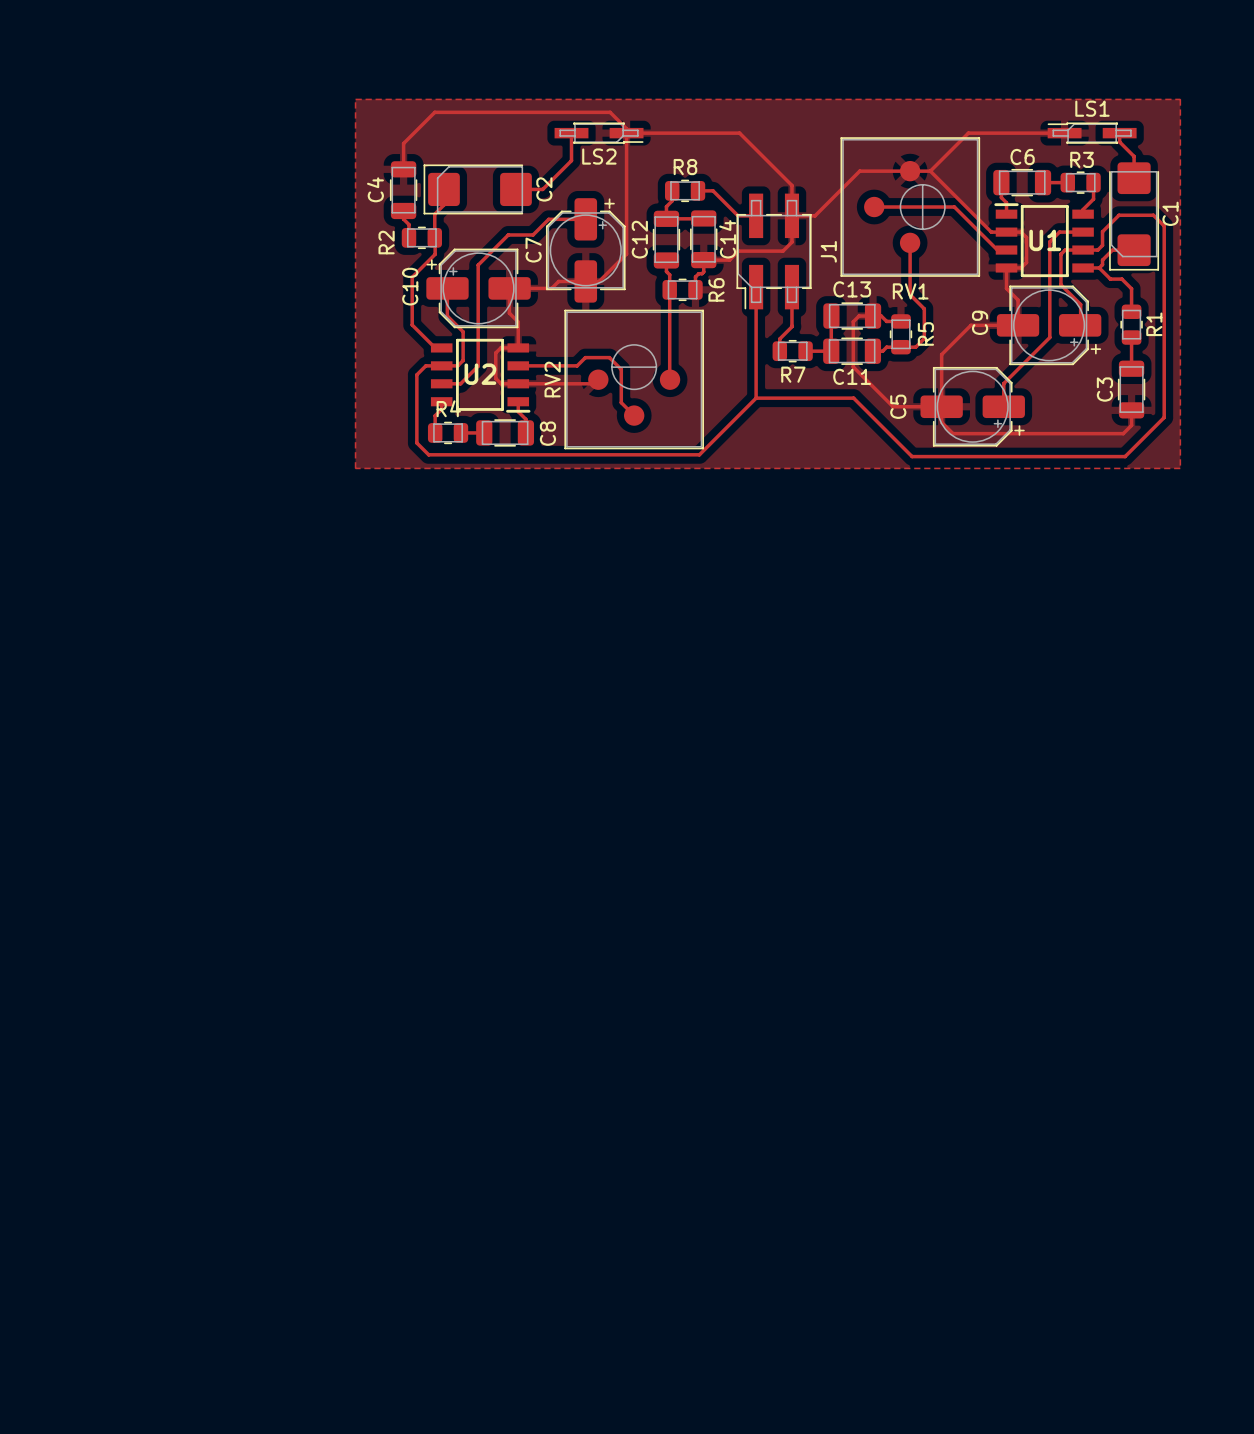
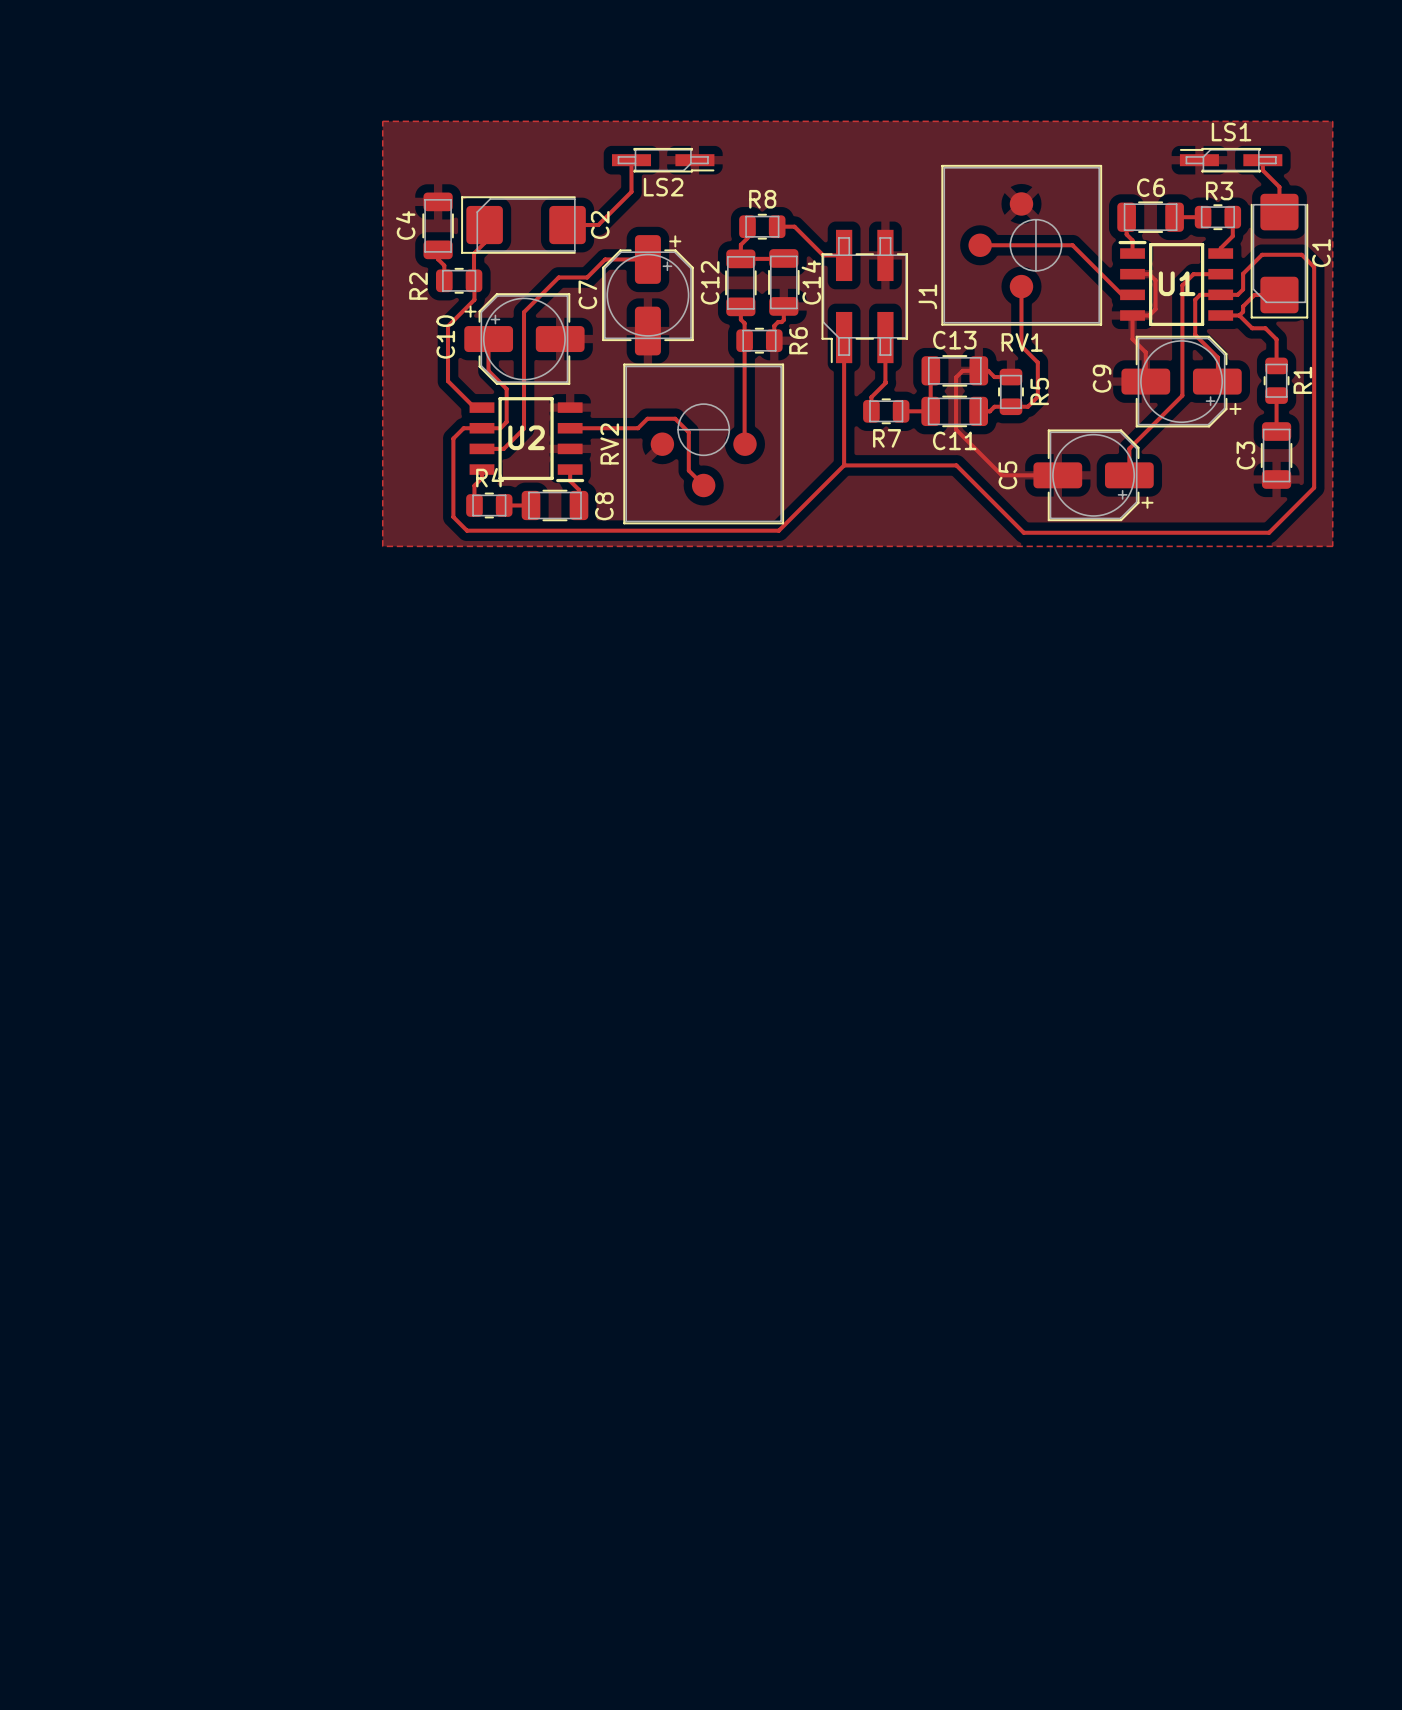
top track: (626, 133) (739, 133) (791, 185) (791, 242) (783, 251) (738, 251) (729, 260) (703, 260) -> none
top track: (1064, 133) (968, 133) (930, 171) -> none
top track: (403, 169) (403, 143) (434, 112) (610, 112) (626, 128) (626, 254) (599, 281) (558, 281) (551, 288) (509, 288) -> none
top track: (930, 171) (859, 171) (815, 215) (791, 215) -> none
top track: (930, 171) (991, 232) (1006, 232) -> none
top track: (509, 288) (509, 313) (518, 322) (518, 347) (500, 347) (495, 352) (495, 378) (501, 383) (594, 383) -> none
top track: (1018, 325) (970, 325) (941, 354) (941, 422) (952, 433) (1123, 433) (1131, 425) (1131, 410) -> none

